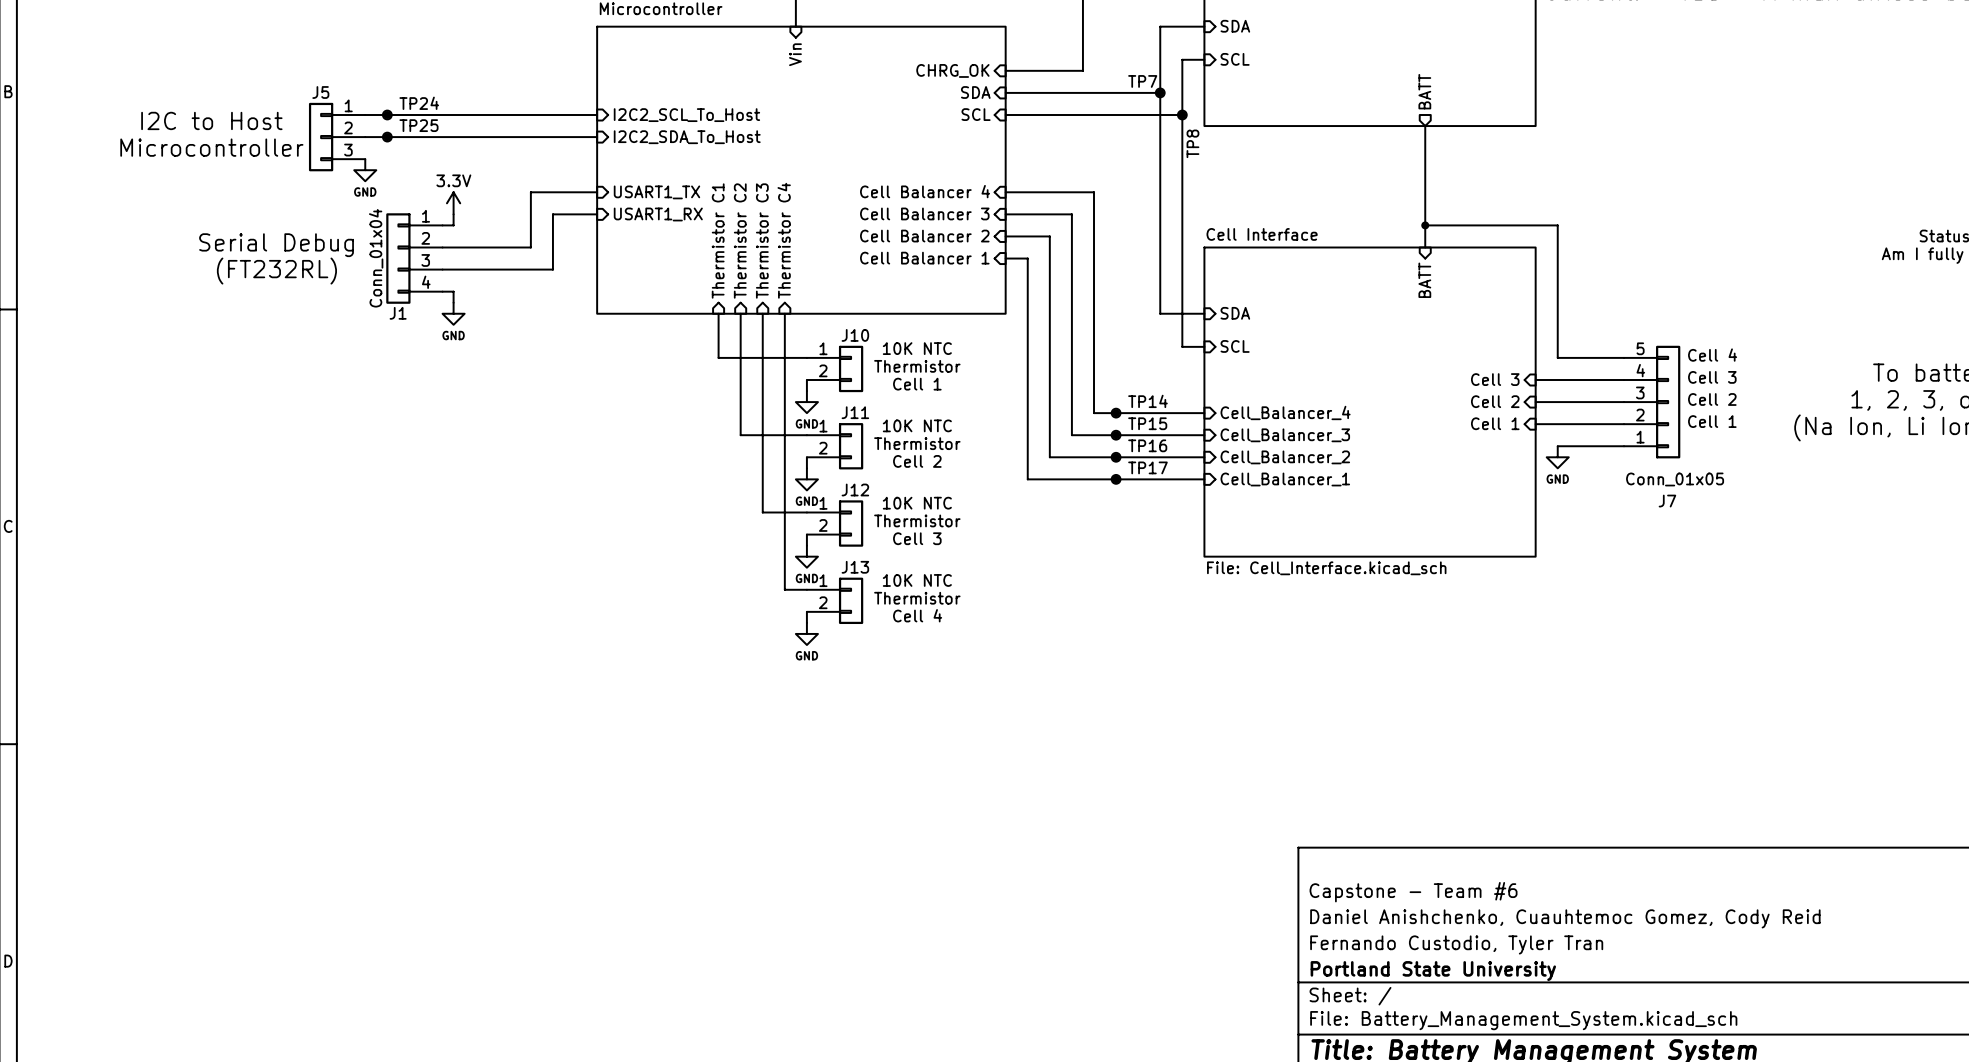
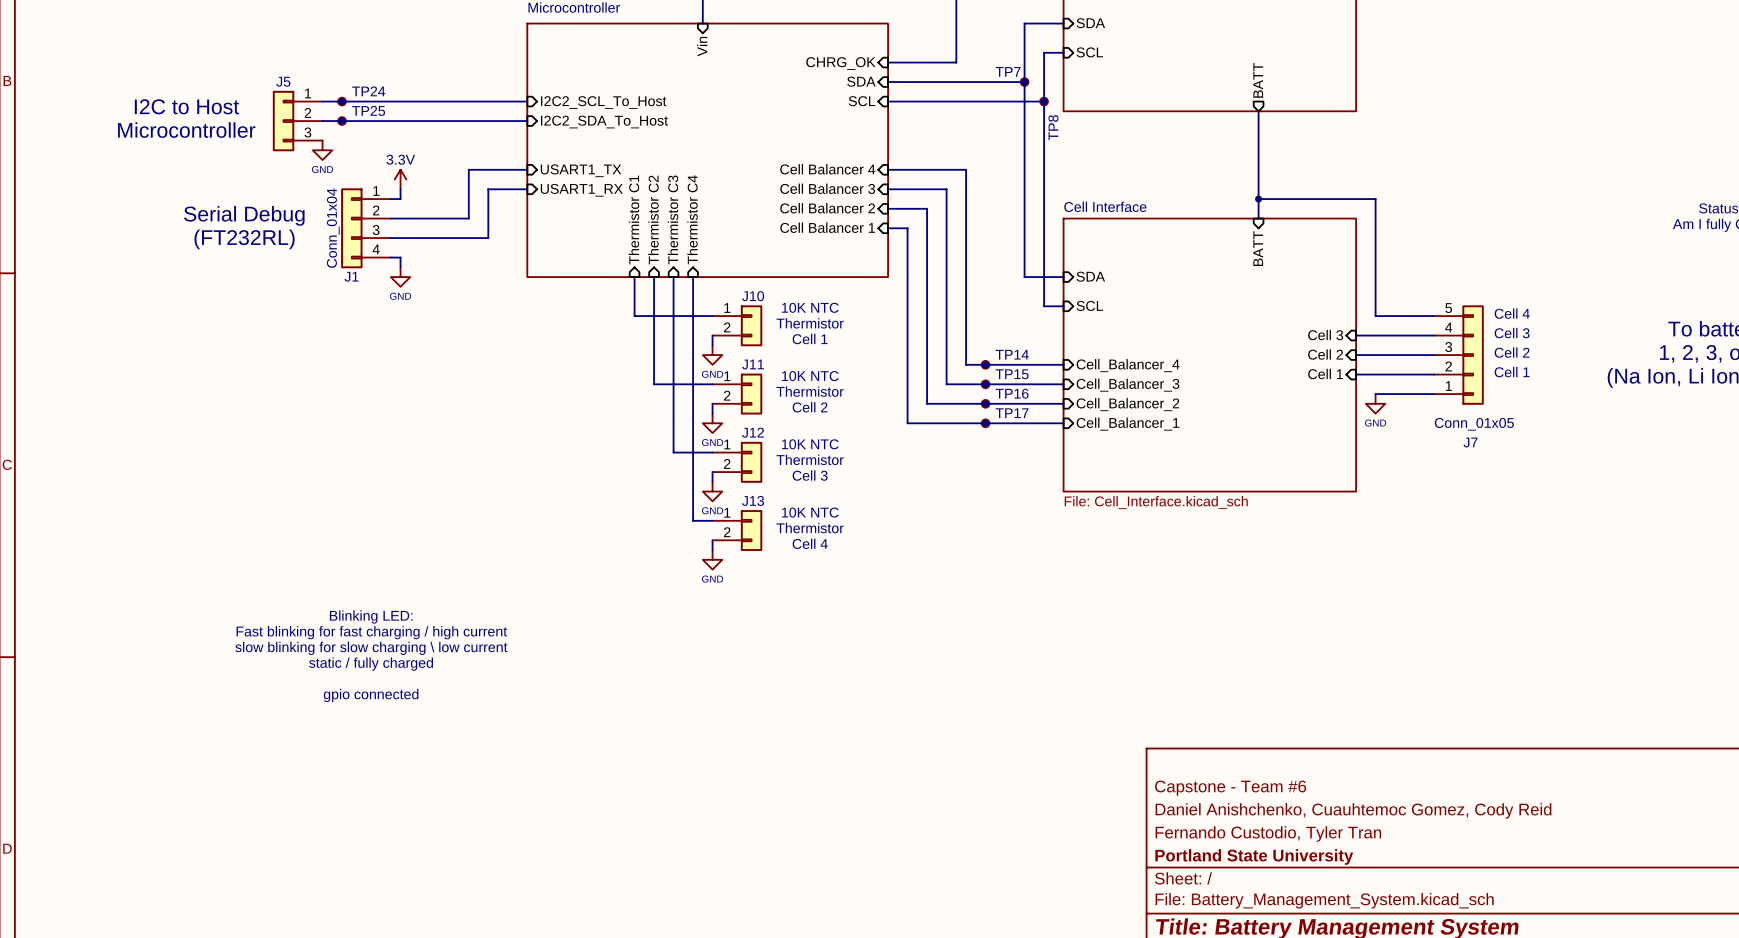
text: none -> Blinking LED: (371, 617)
text: none -> Fast blinking for fast charging / high current (371, 632)
text: none -> slow blinking for slow charging \ low current (371, 648)
text: none -> static / fully charged (371, 664)
text: none -> gpio connected (371, 695)

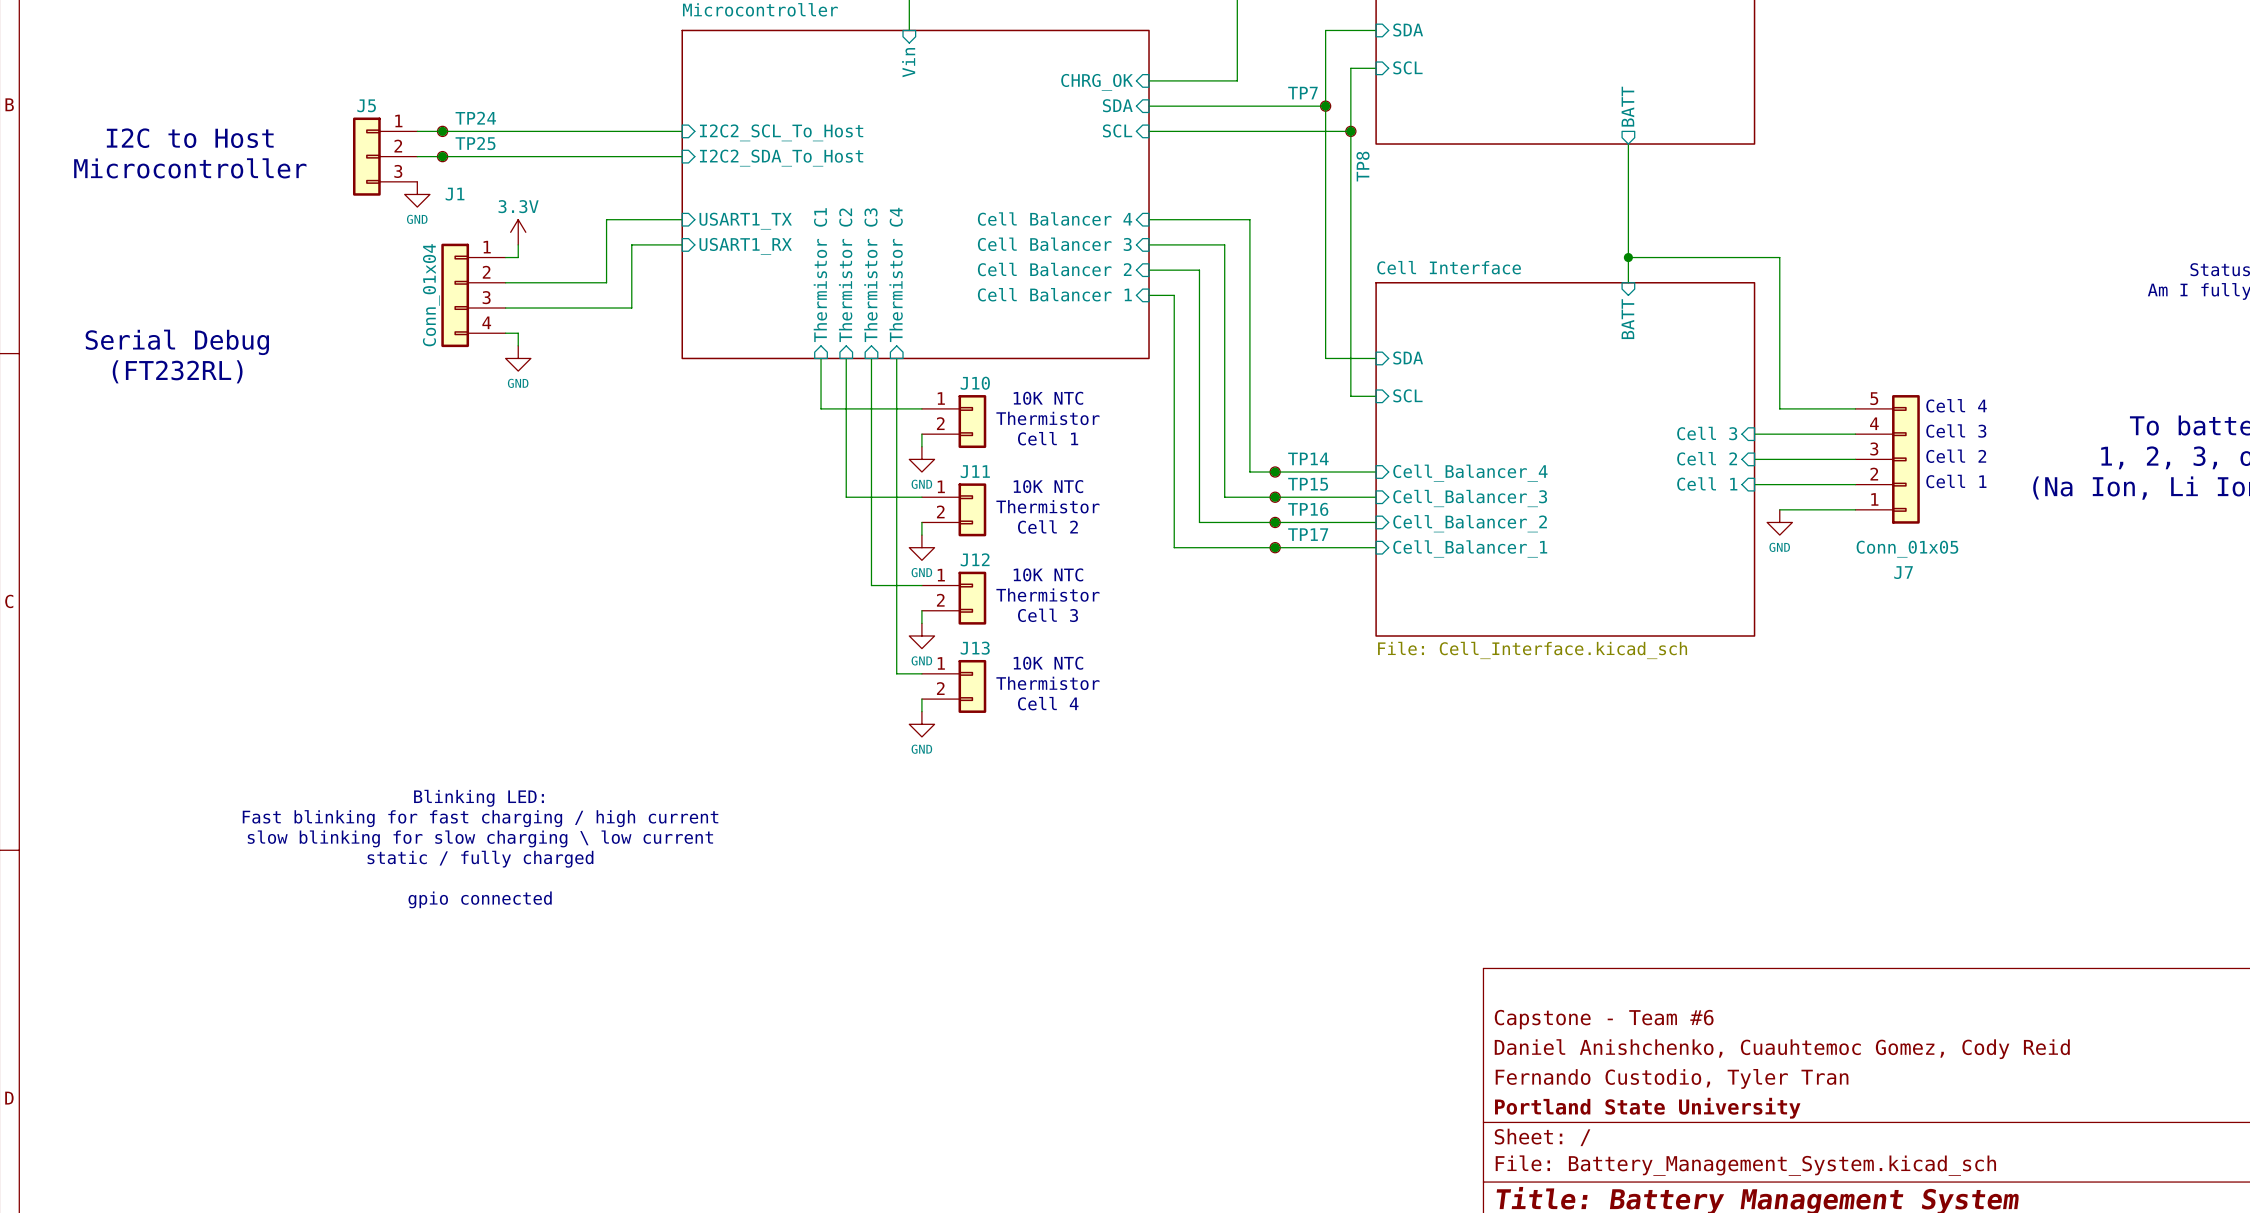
text position: I2C to Host (186, 106) -> I2C to Host (190, 138)
text position: Microcontroller (186, 130) -> Microcontroller (190, 168)
text position: Serial Debug (244, 215) -> Serial Debug (177, 342)
text position: (FT232RL) (244, 239) -> (FT232RL) (177, 371)
J1 name position: J1 (351, 276) -> J1 (455, 194)

